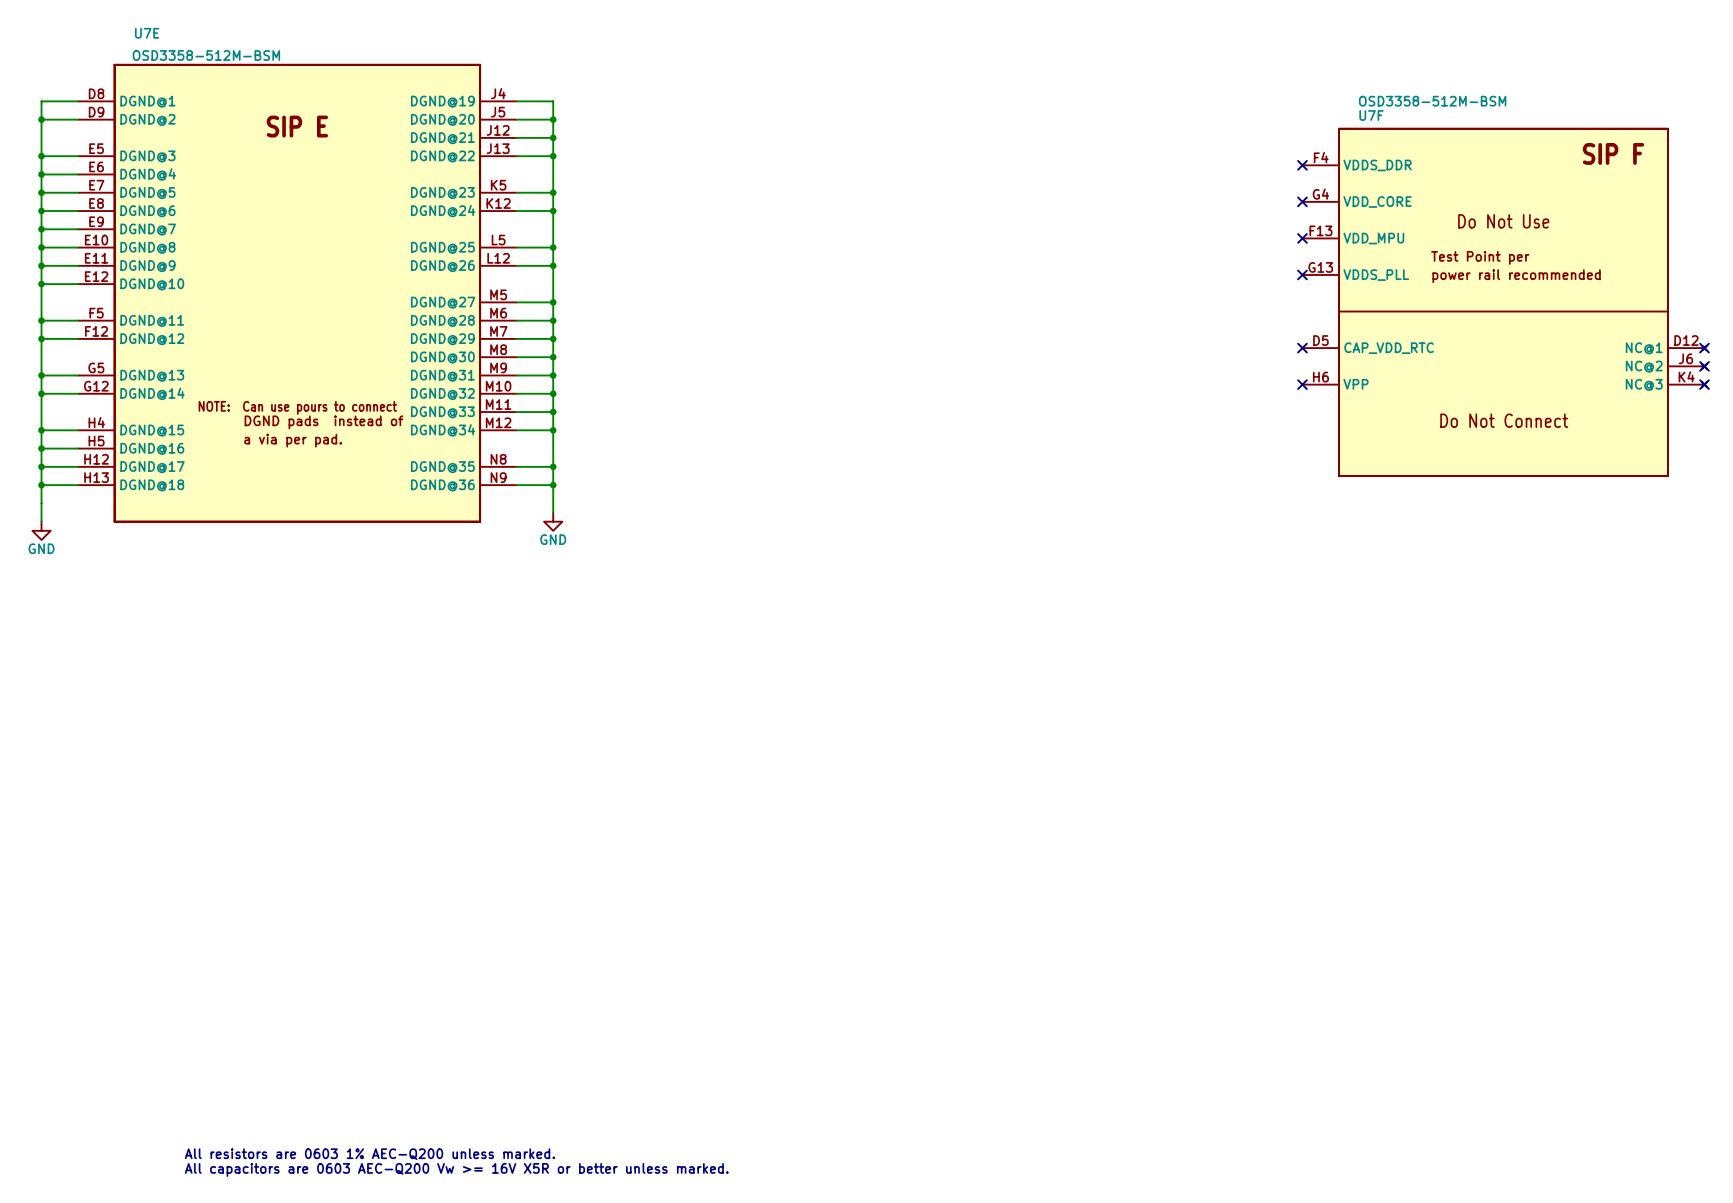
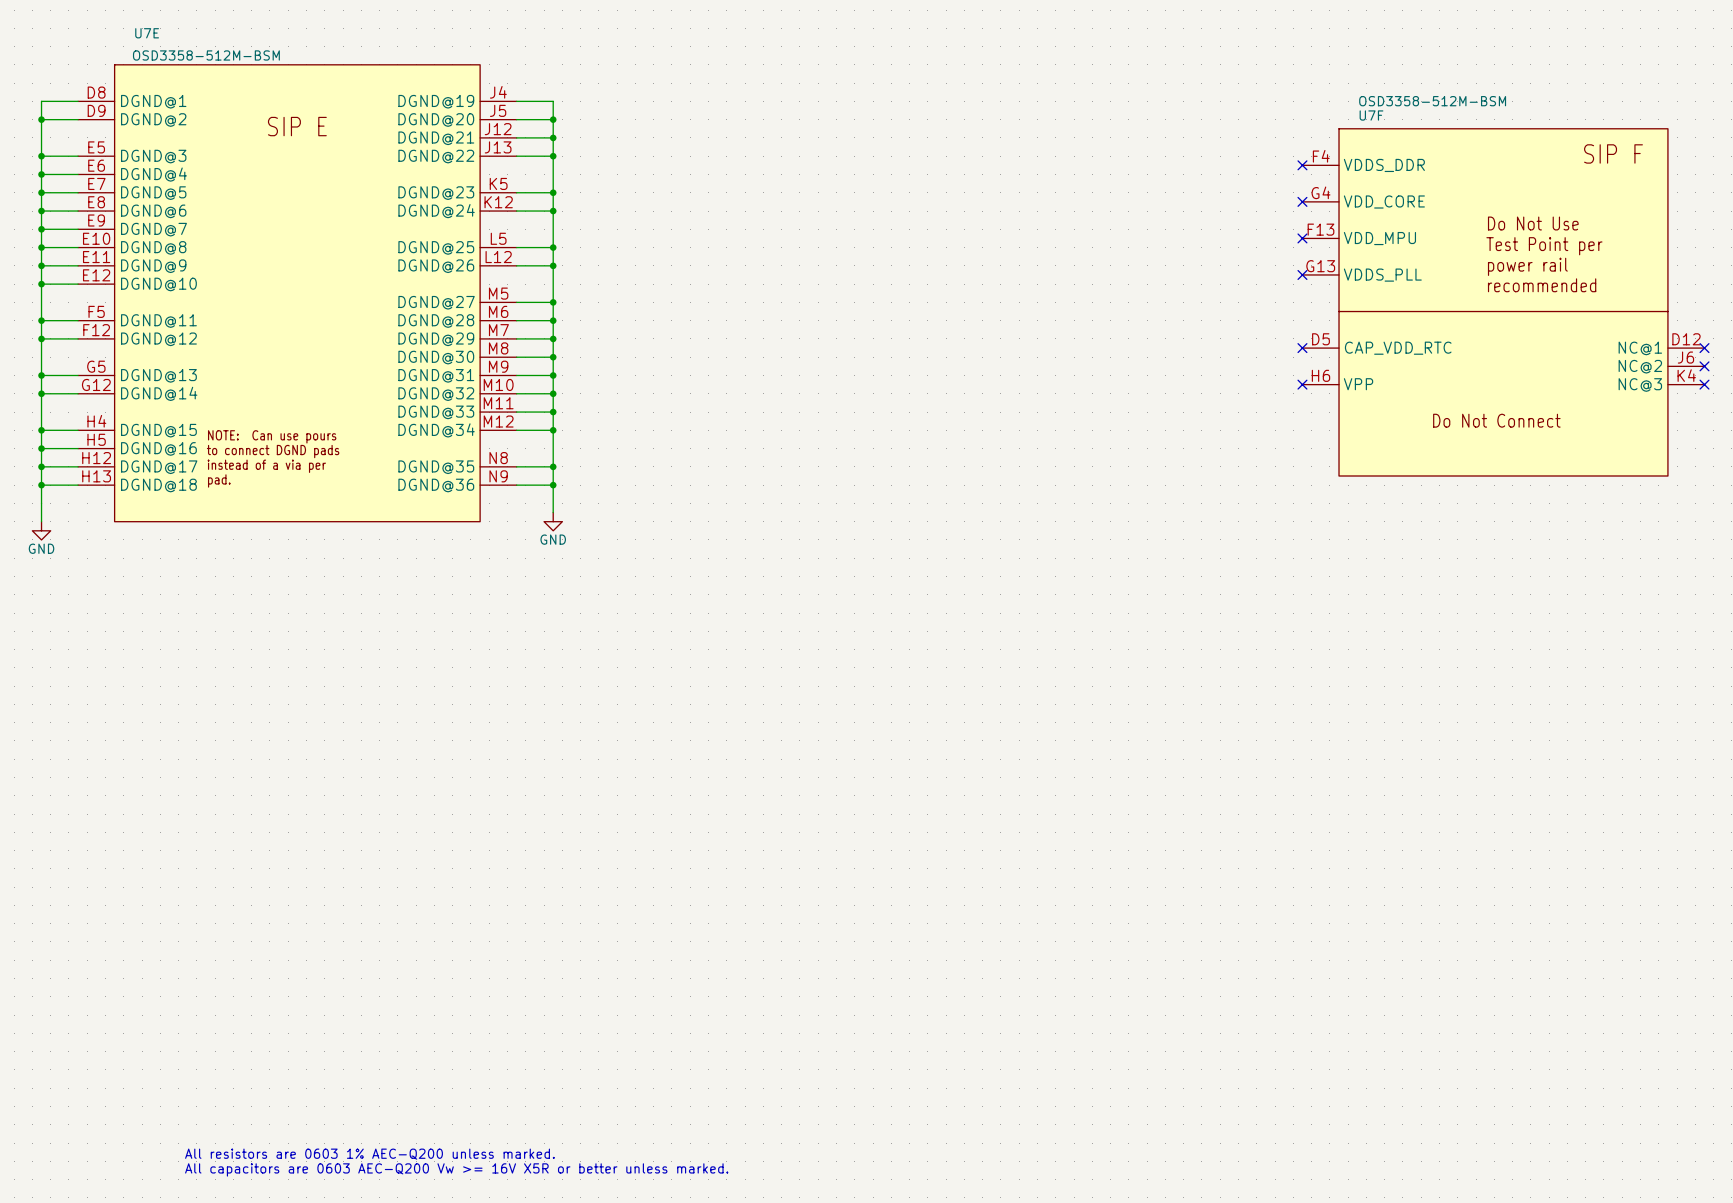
U7E symbol: [78, 63, 517, 523] -> [78, 64, 517, 522]
U7F symbol: [1302, 127, 1707, 477] -> [1302, 128, 1705, 477]

